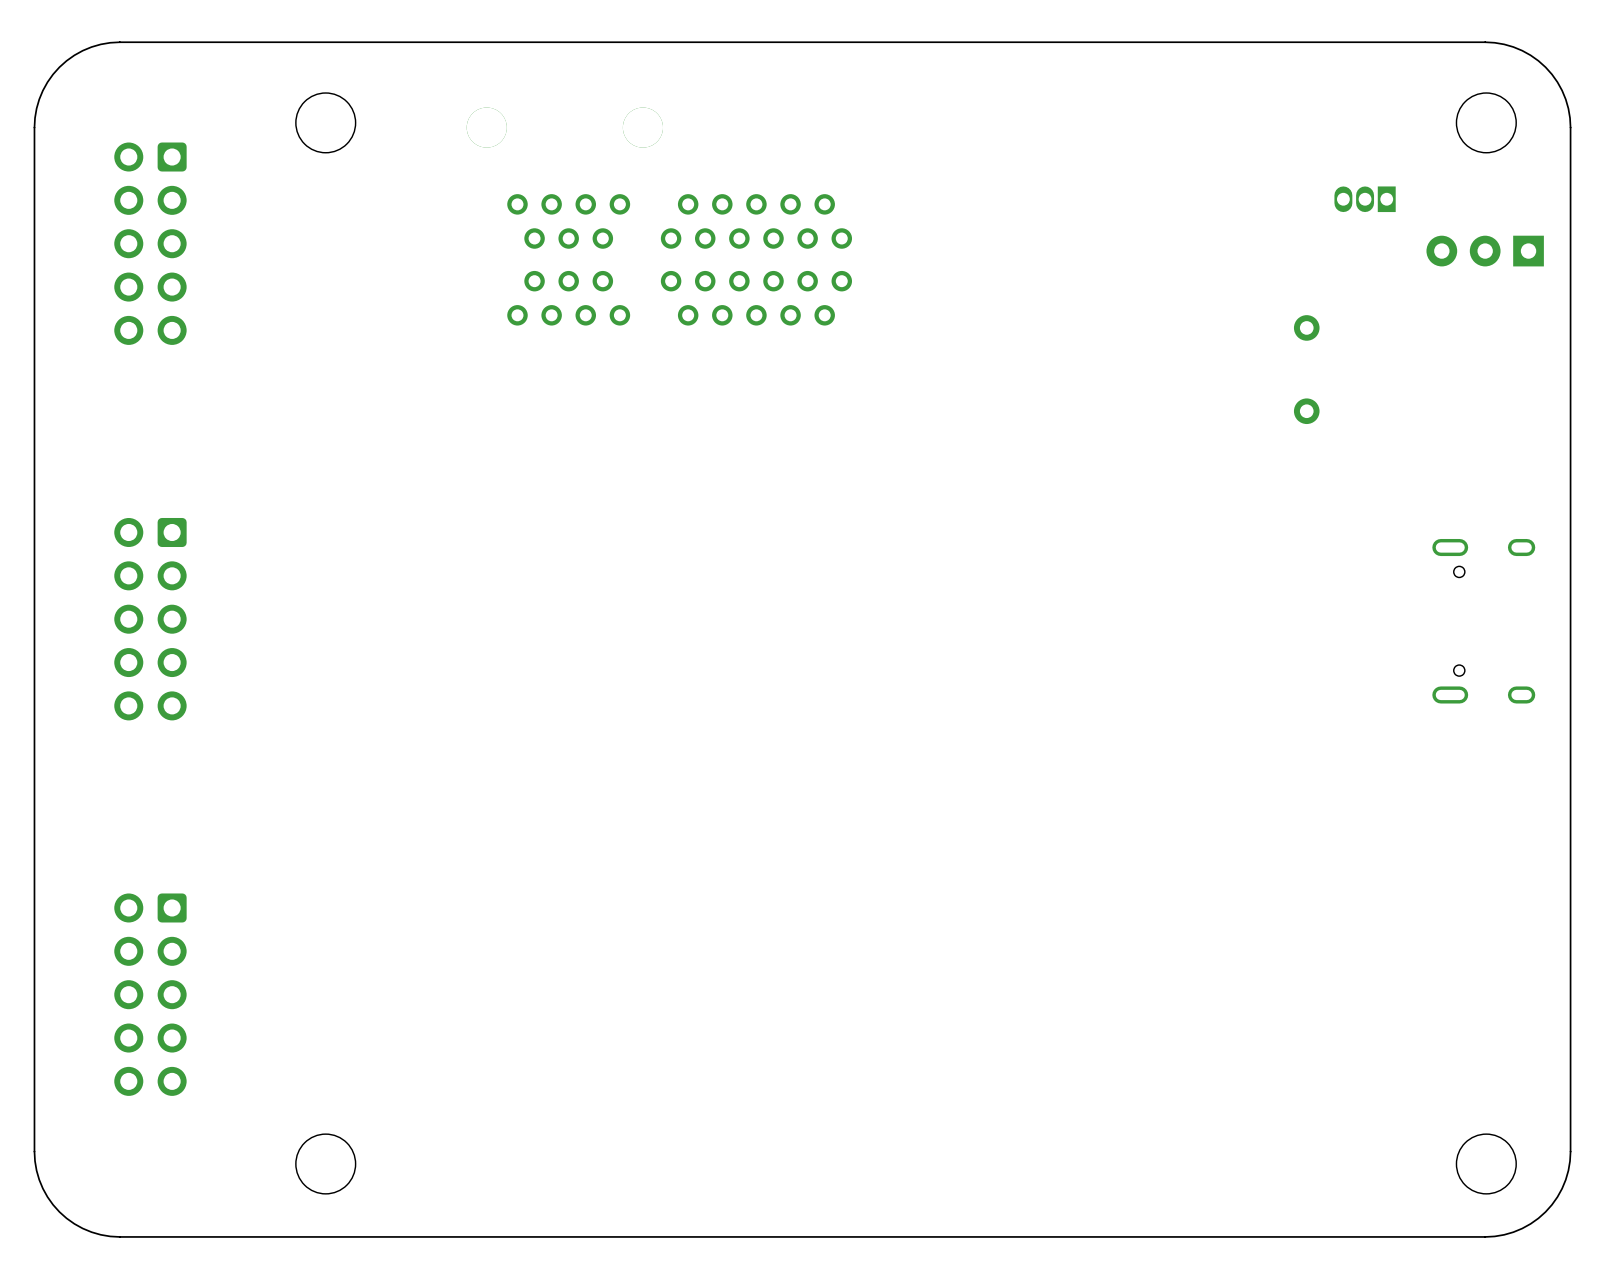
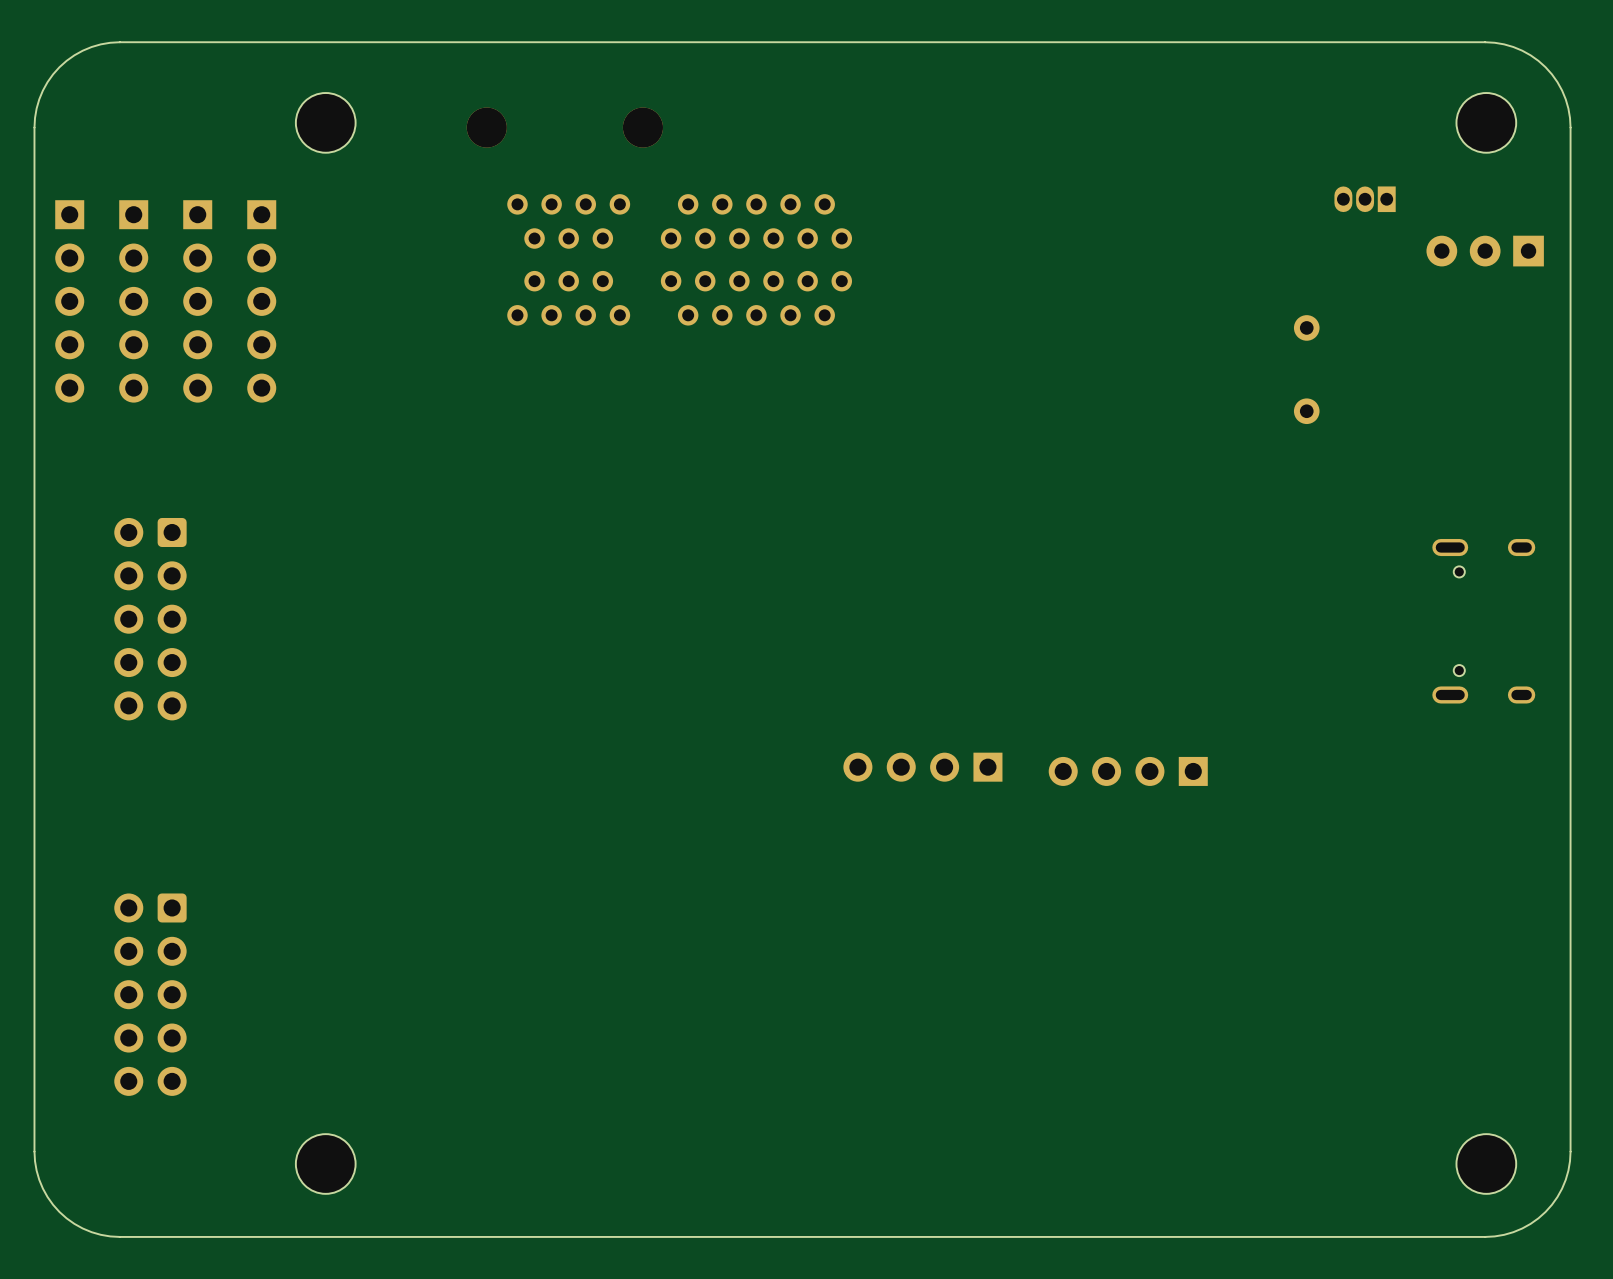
part: (150, 243) -> none
part: none -> (69, 301)
part: none -> (133, 301)
part: none -> (197, 301)
part: none -> (261, 301)
part: none -> (922, 767)
part: none -> (1128, 771)

